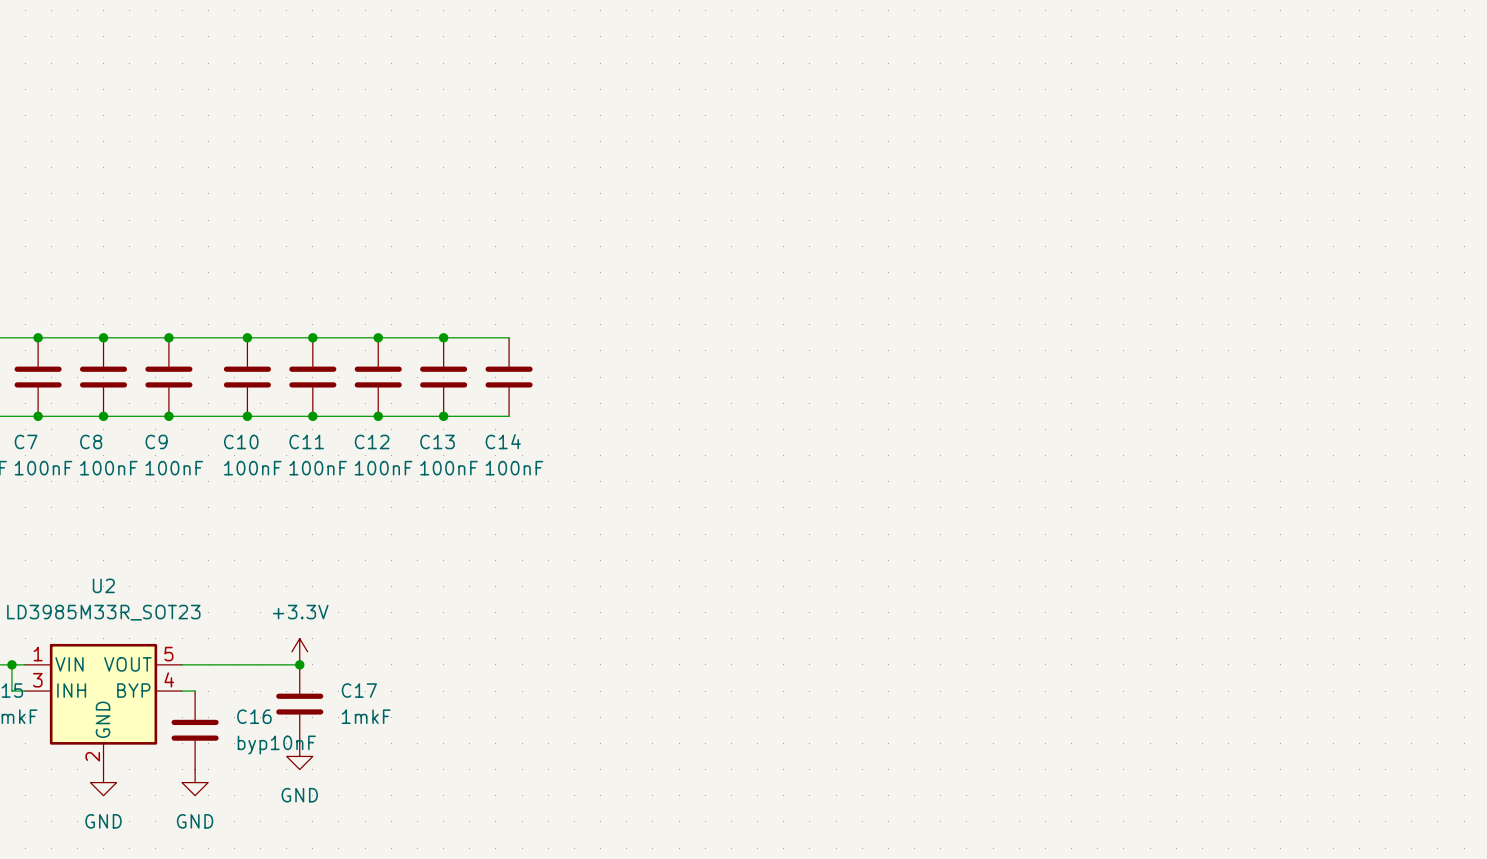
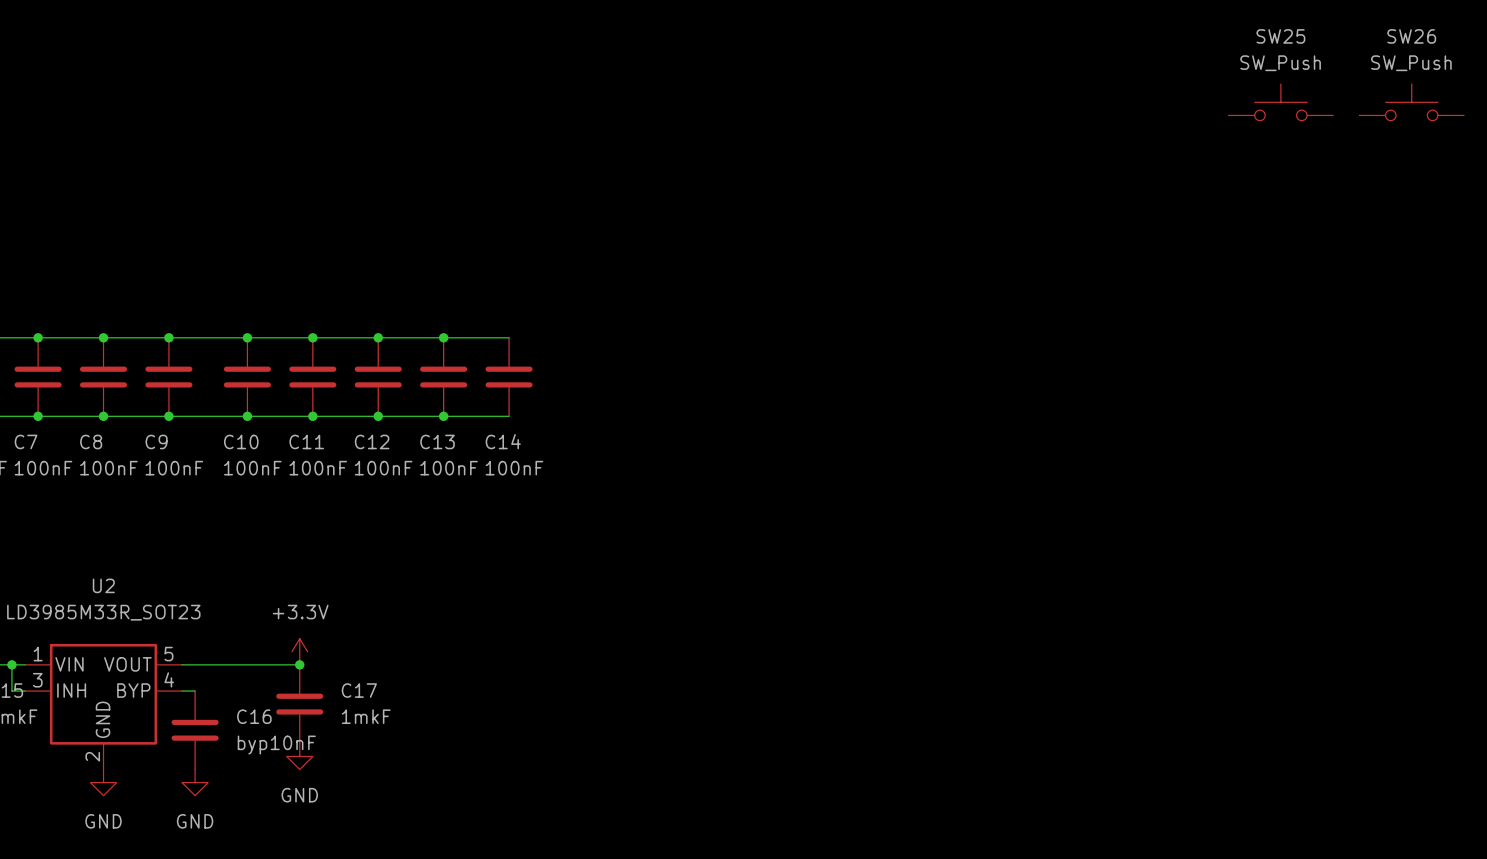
SW25: none -> SW_Push (1280, 102)
SW26: none -> SW_Push (1411, 102)

